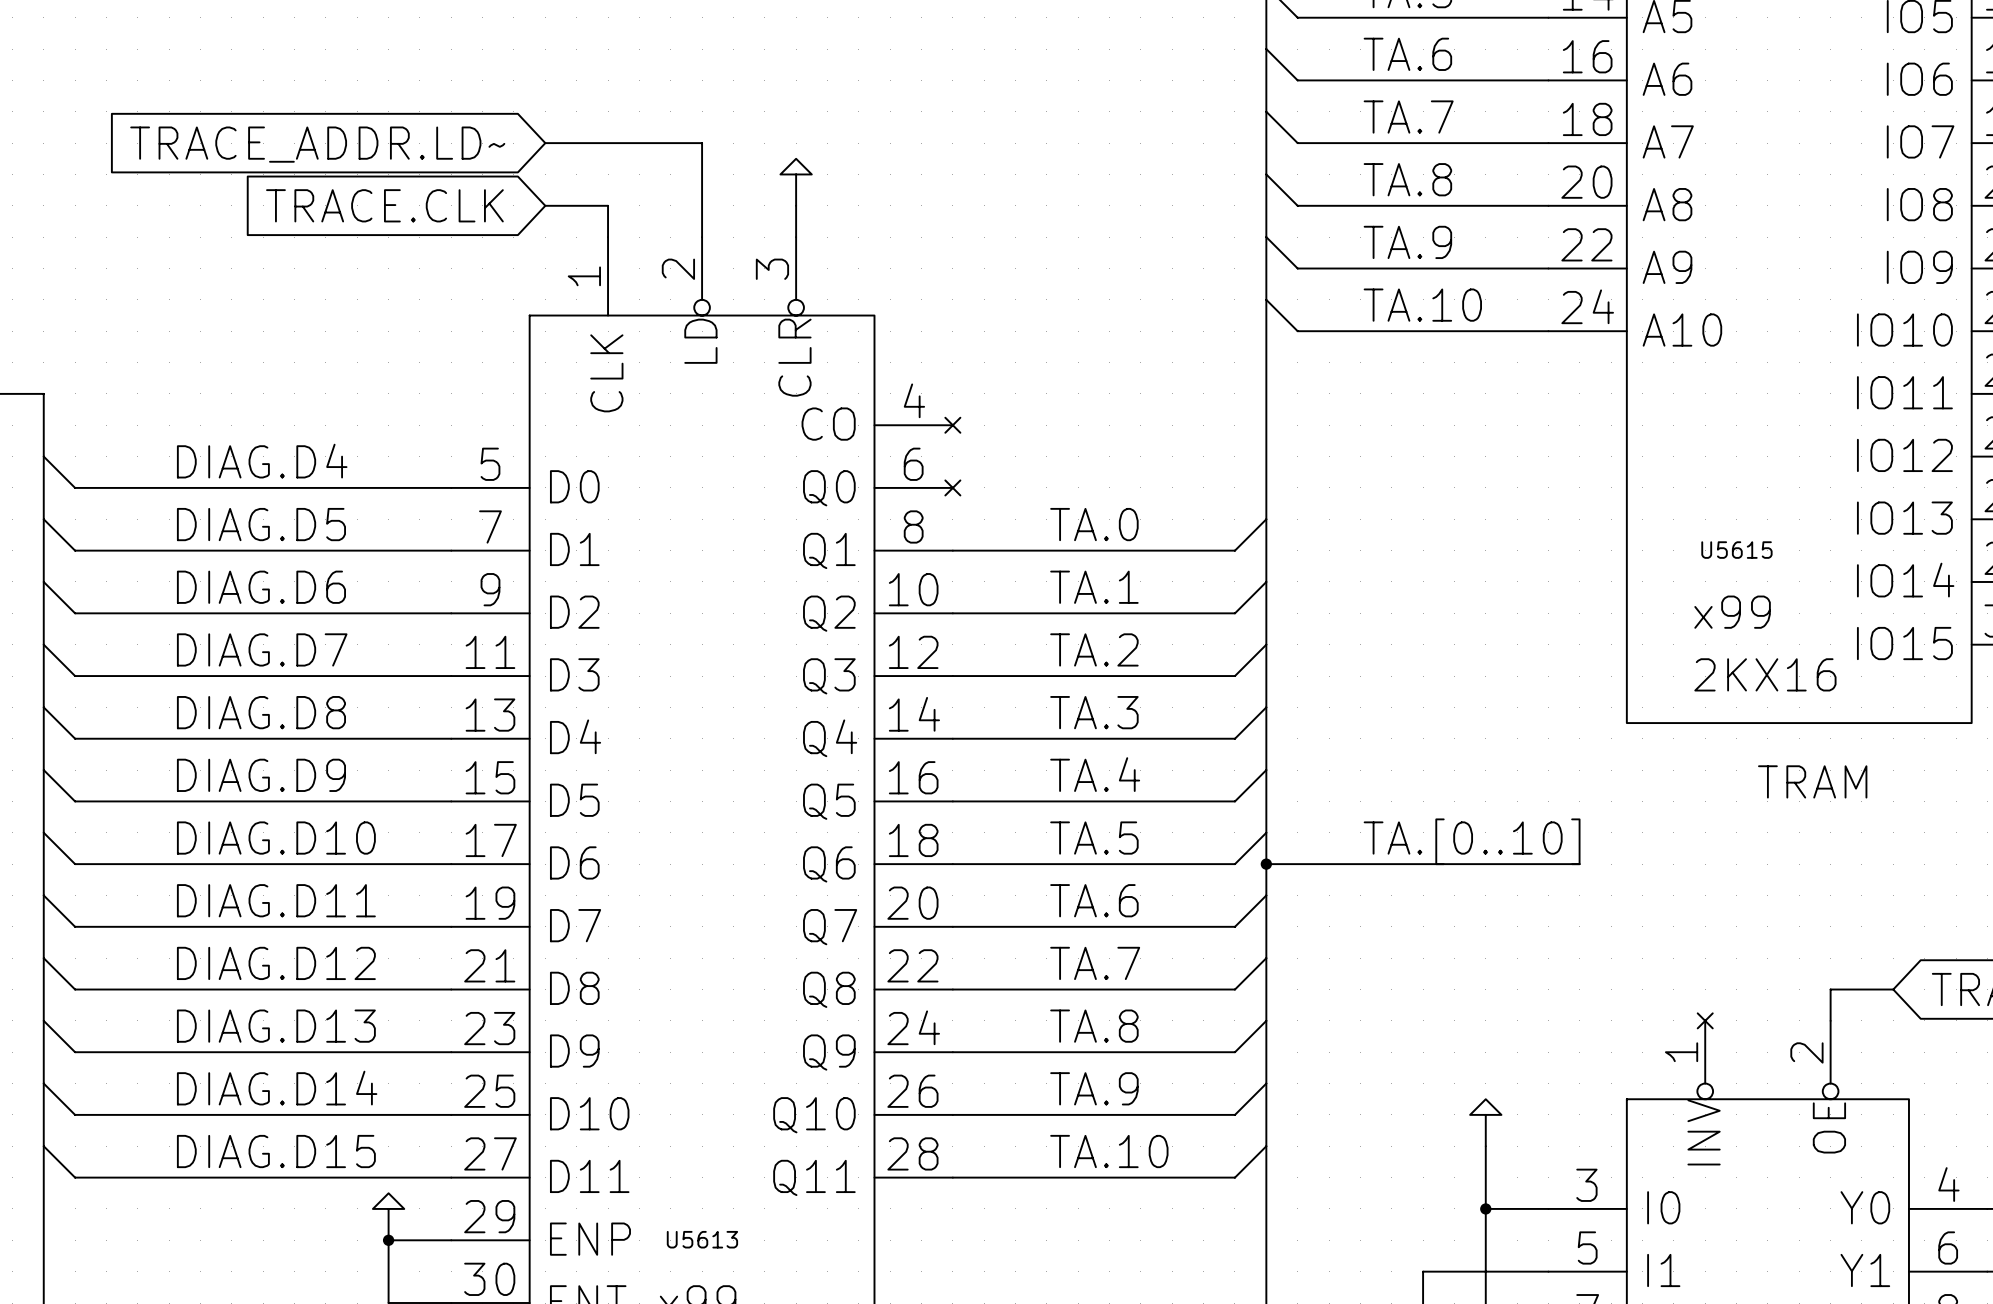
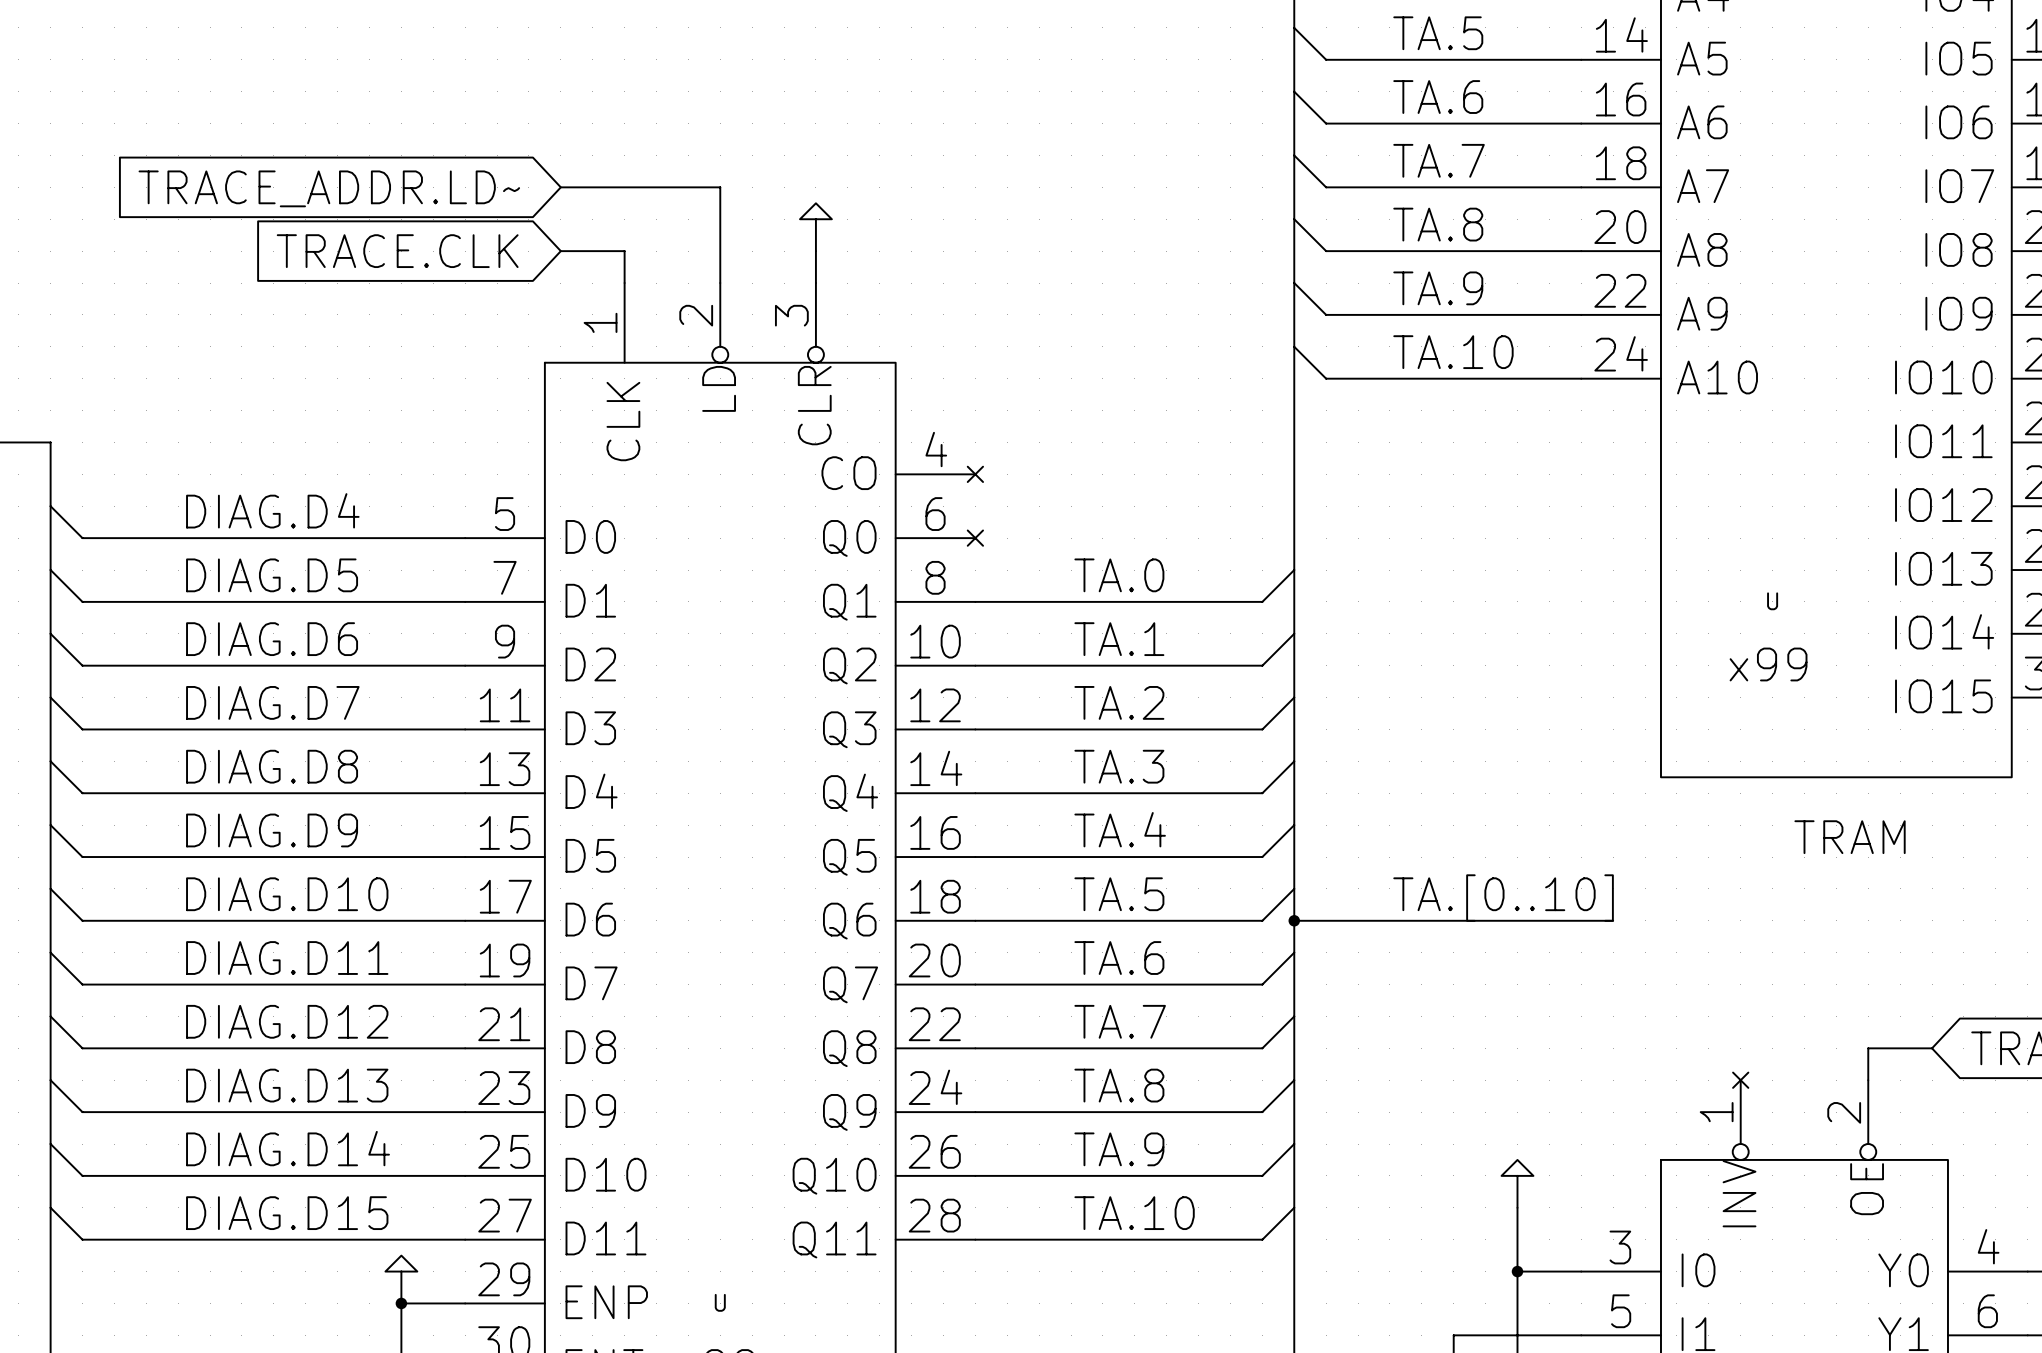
U5615 name: U5615 (1736, 550) -> U (1772, 601)
U5615 value: 2KX16 (1765, 674) -> none
U5613 name: U5613 (702, 1239) -> U (720, 1302)

